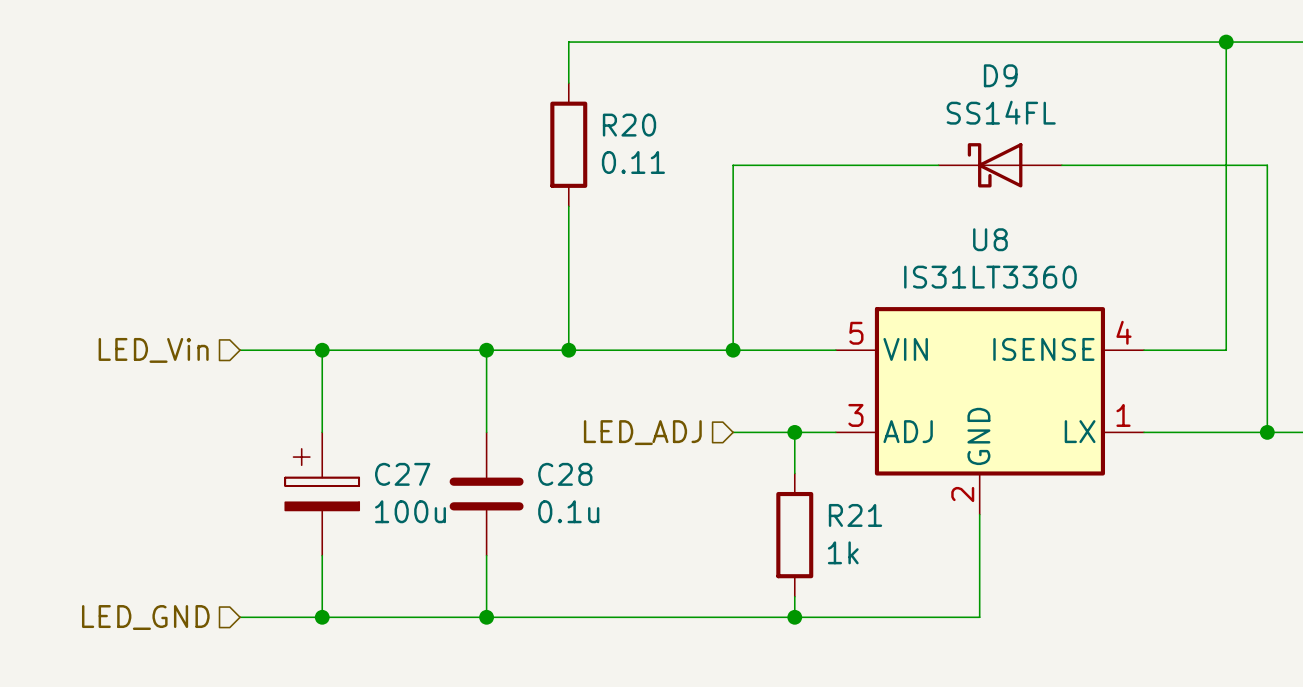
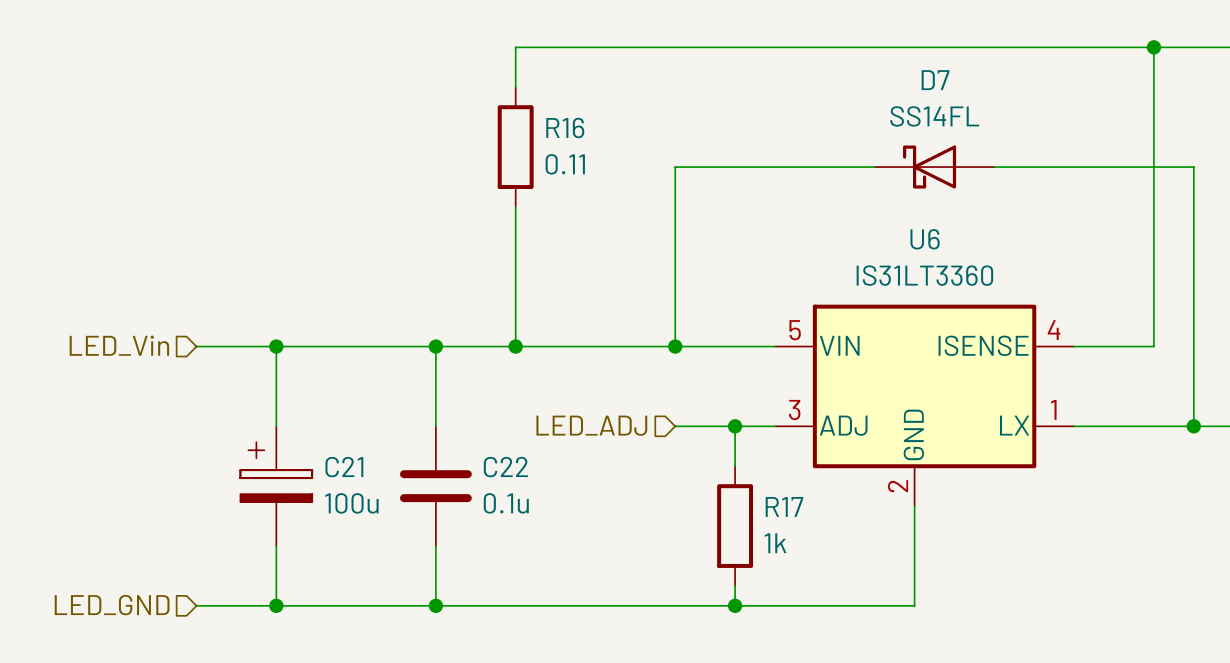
D9 name: D9 (1000, 75) -> D7 (935, 80)
R20 name: R20 (629, 125) -> R16 (565, 127)
U8 name: U8 (990, 239) -> U6 (925, 239)
C27 name: C27 (402, 474) -> C21 (344, 467)
C28 name: C28 (565, 474) -> C22 (505, 467)
R21 name: R21 (855, 515) -> R17 (784, 506)

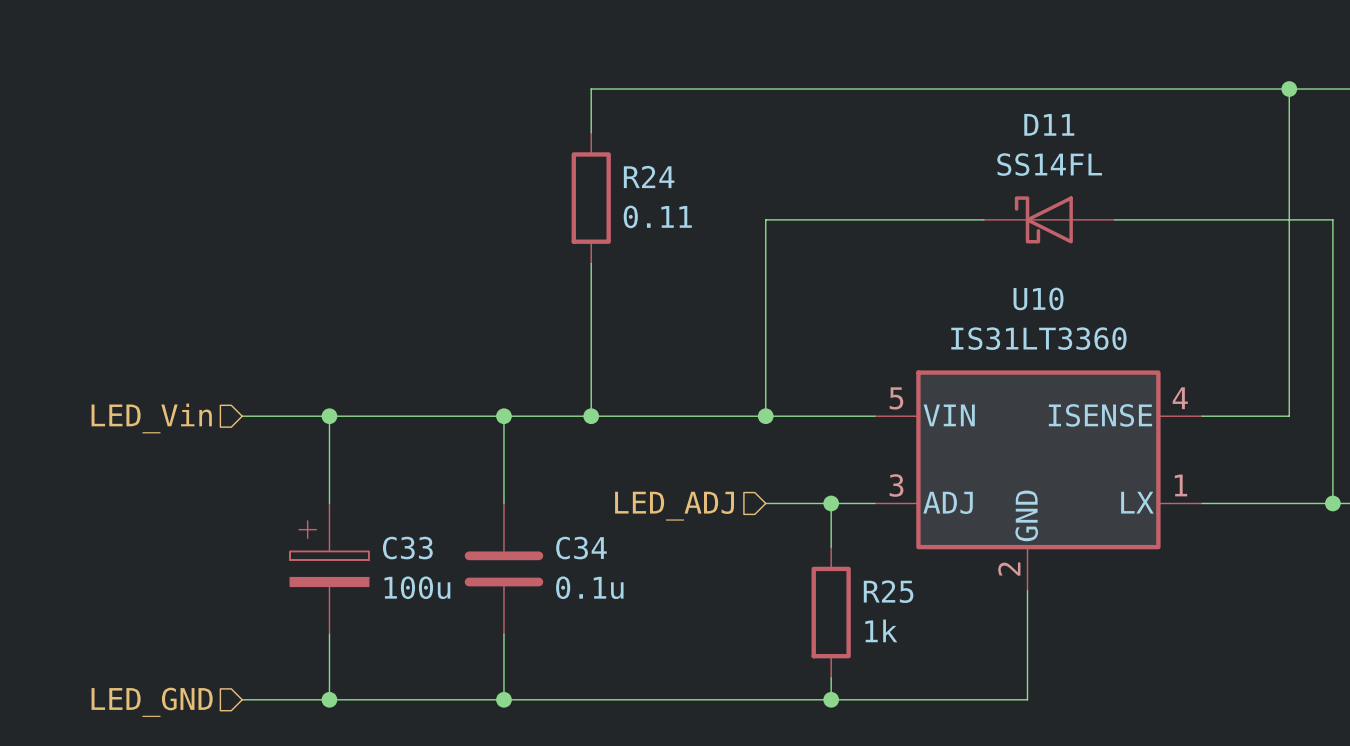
D7 name: D7 (935, 80) -> D11 (1049, 124)
R16 name: R16 (565, 127) -> R24 (649, 177)
U6 name: U6 (925, 239) -> U10 (1038, 298)
C21 name: C21 (344, 467) -> C33 (407, 548)
C22 name: C22 (505, 467) -> C34 (581, 548)
R17 name: R17 (784, 506) -> R25 (888, 591)

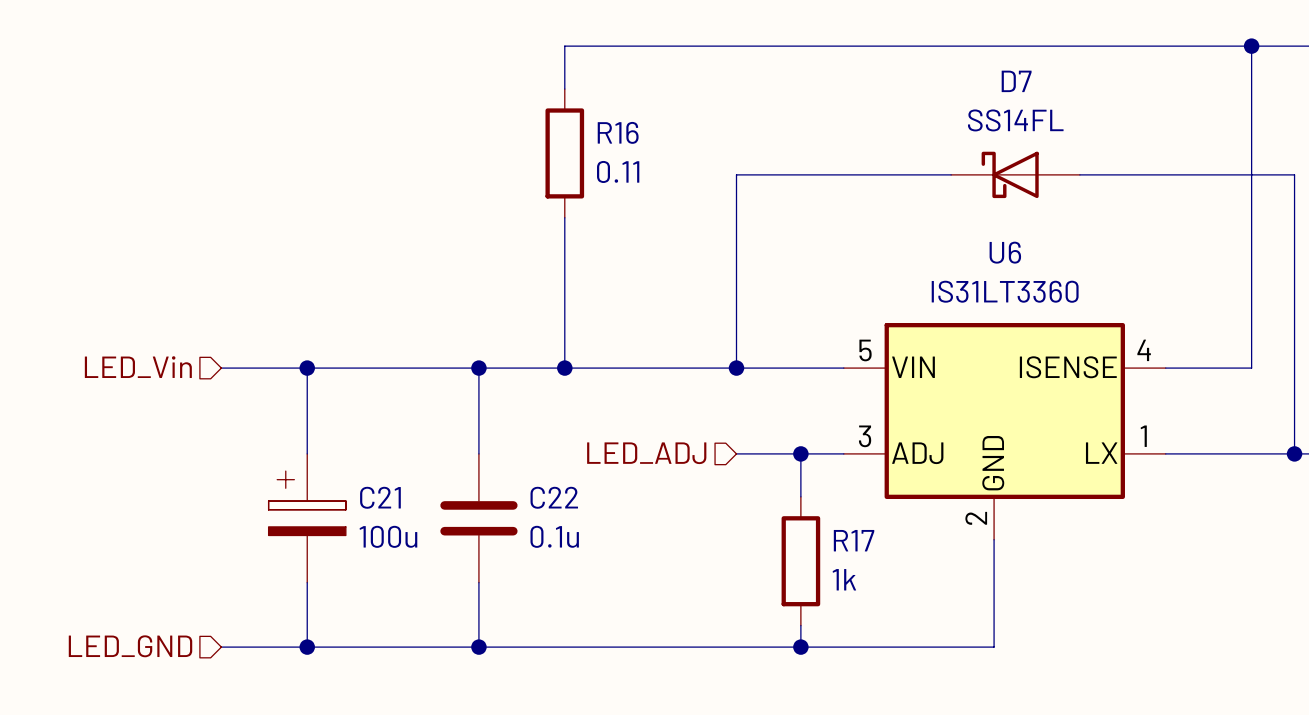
D11 name: D11 (1049, 124) -> D7 (1016, 81)
R24 name: R24 (649, 177) -> R16 (618, 132)
U10 name: U10 (1038, 298) -> U6 (1005, 252)
C33 name: C33 (407, 548) -> C21 (380, 497)
C34 name: C34 (581, 548) -> C22 (554, 497)
R25 name: R25 (888, 591) -> R17 (854, 540)

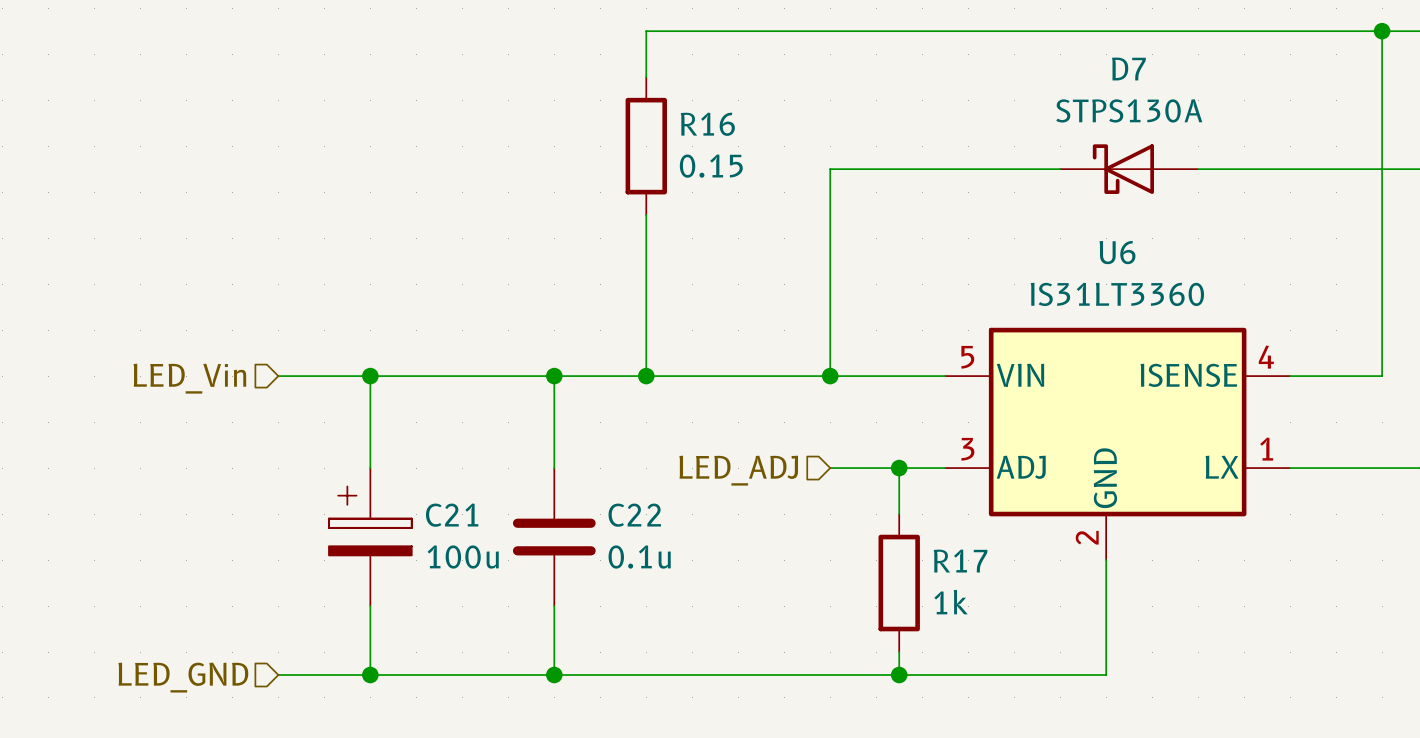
D7 value: SS14FL (1015, 120) -> STPS130A (1129, 110)
R16 value: 0.11 (618, 171) -> 0.15 (711, 166)

